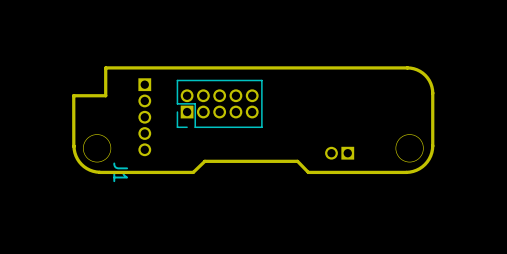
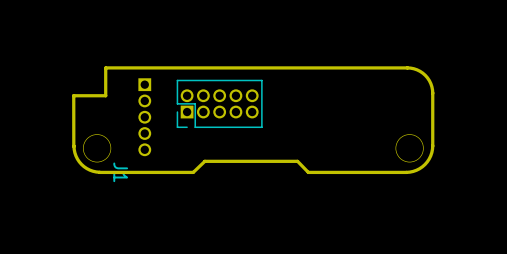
part: (339, 153) -> none

